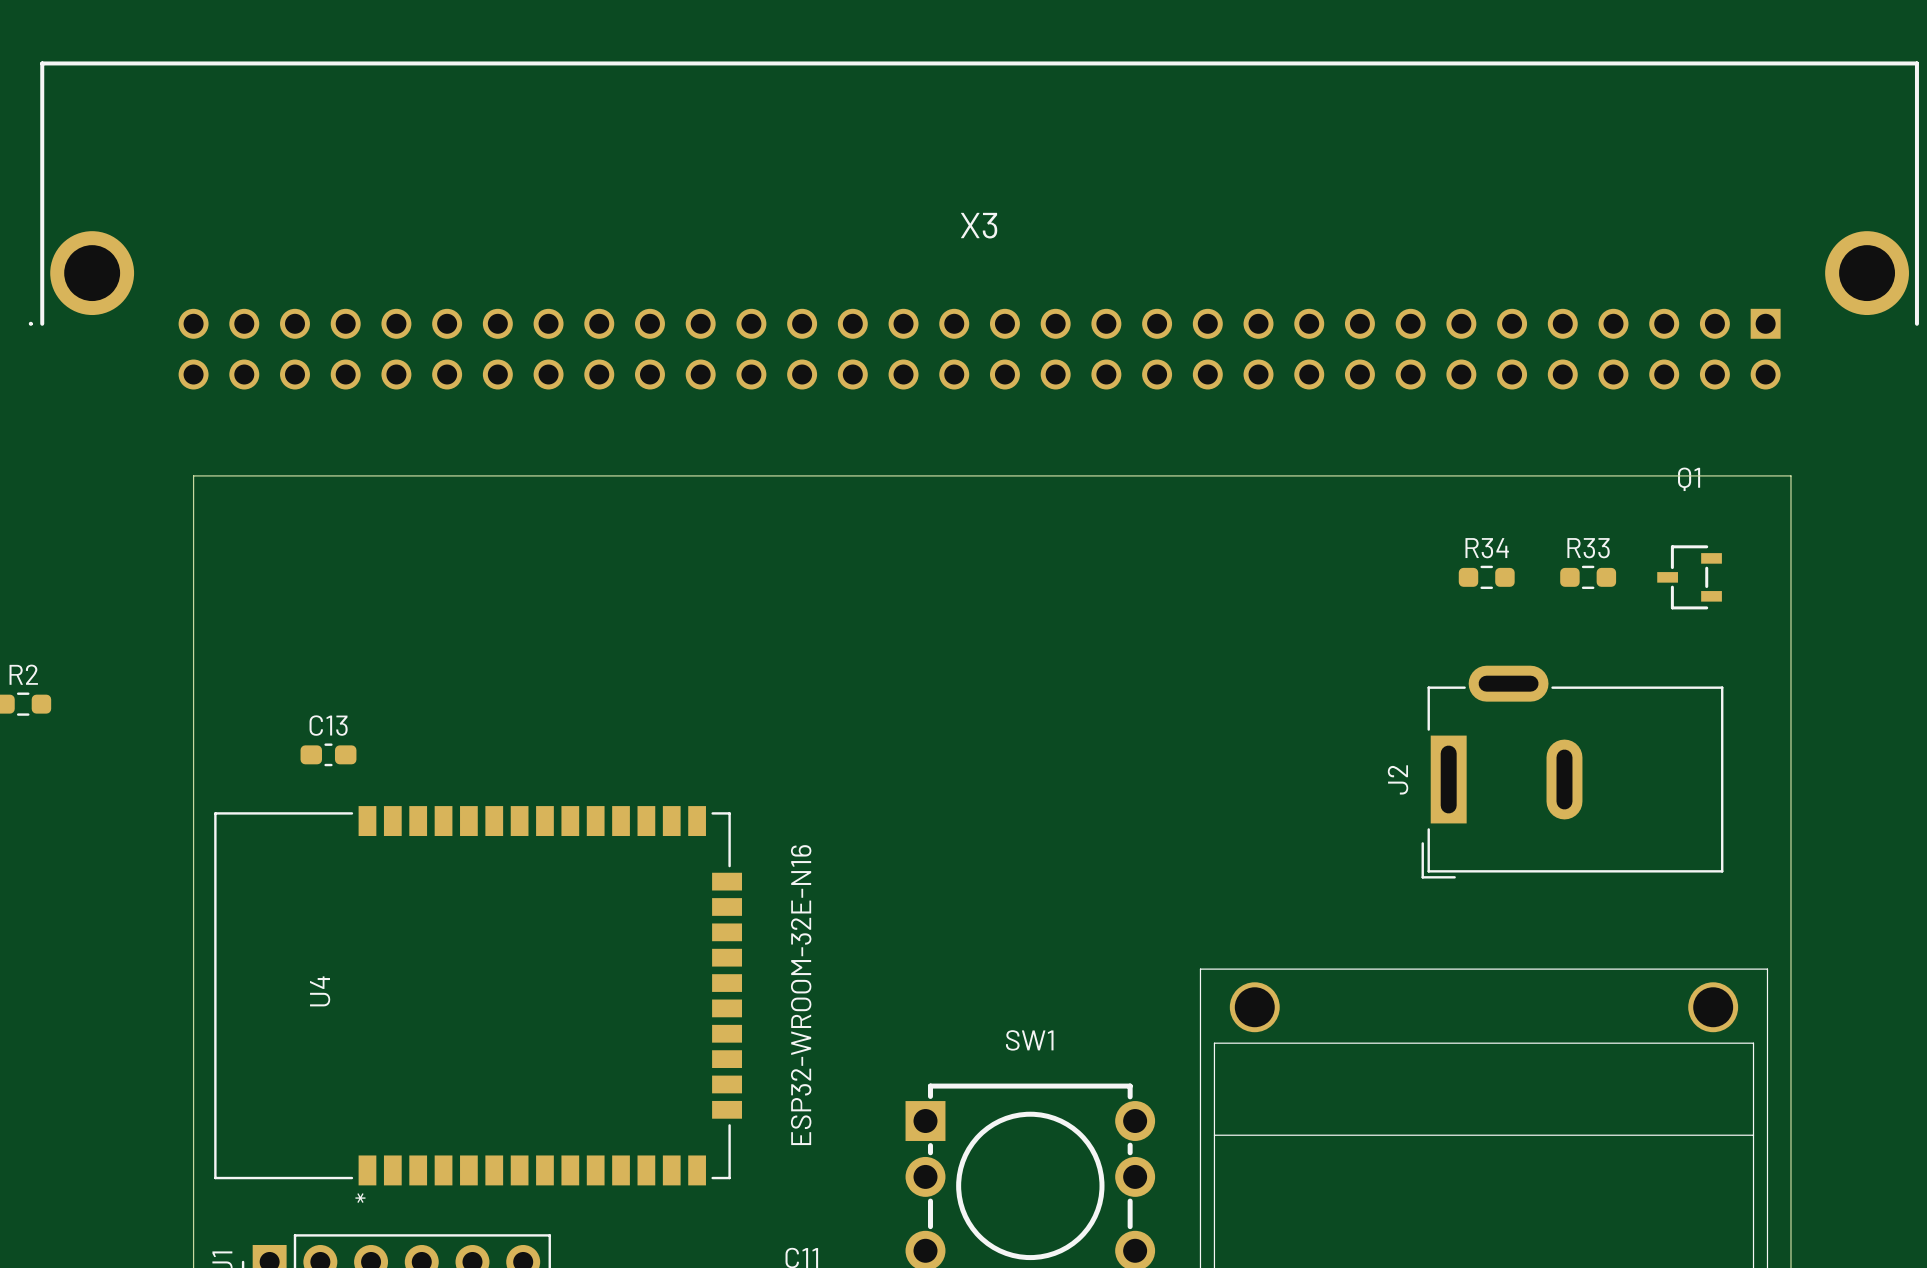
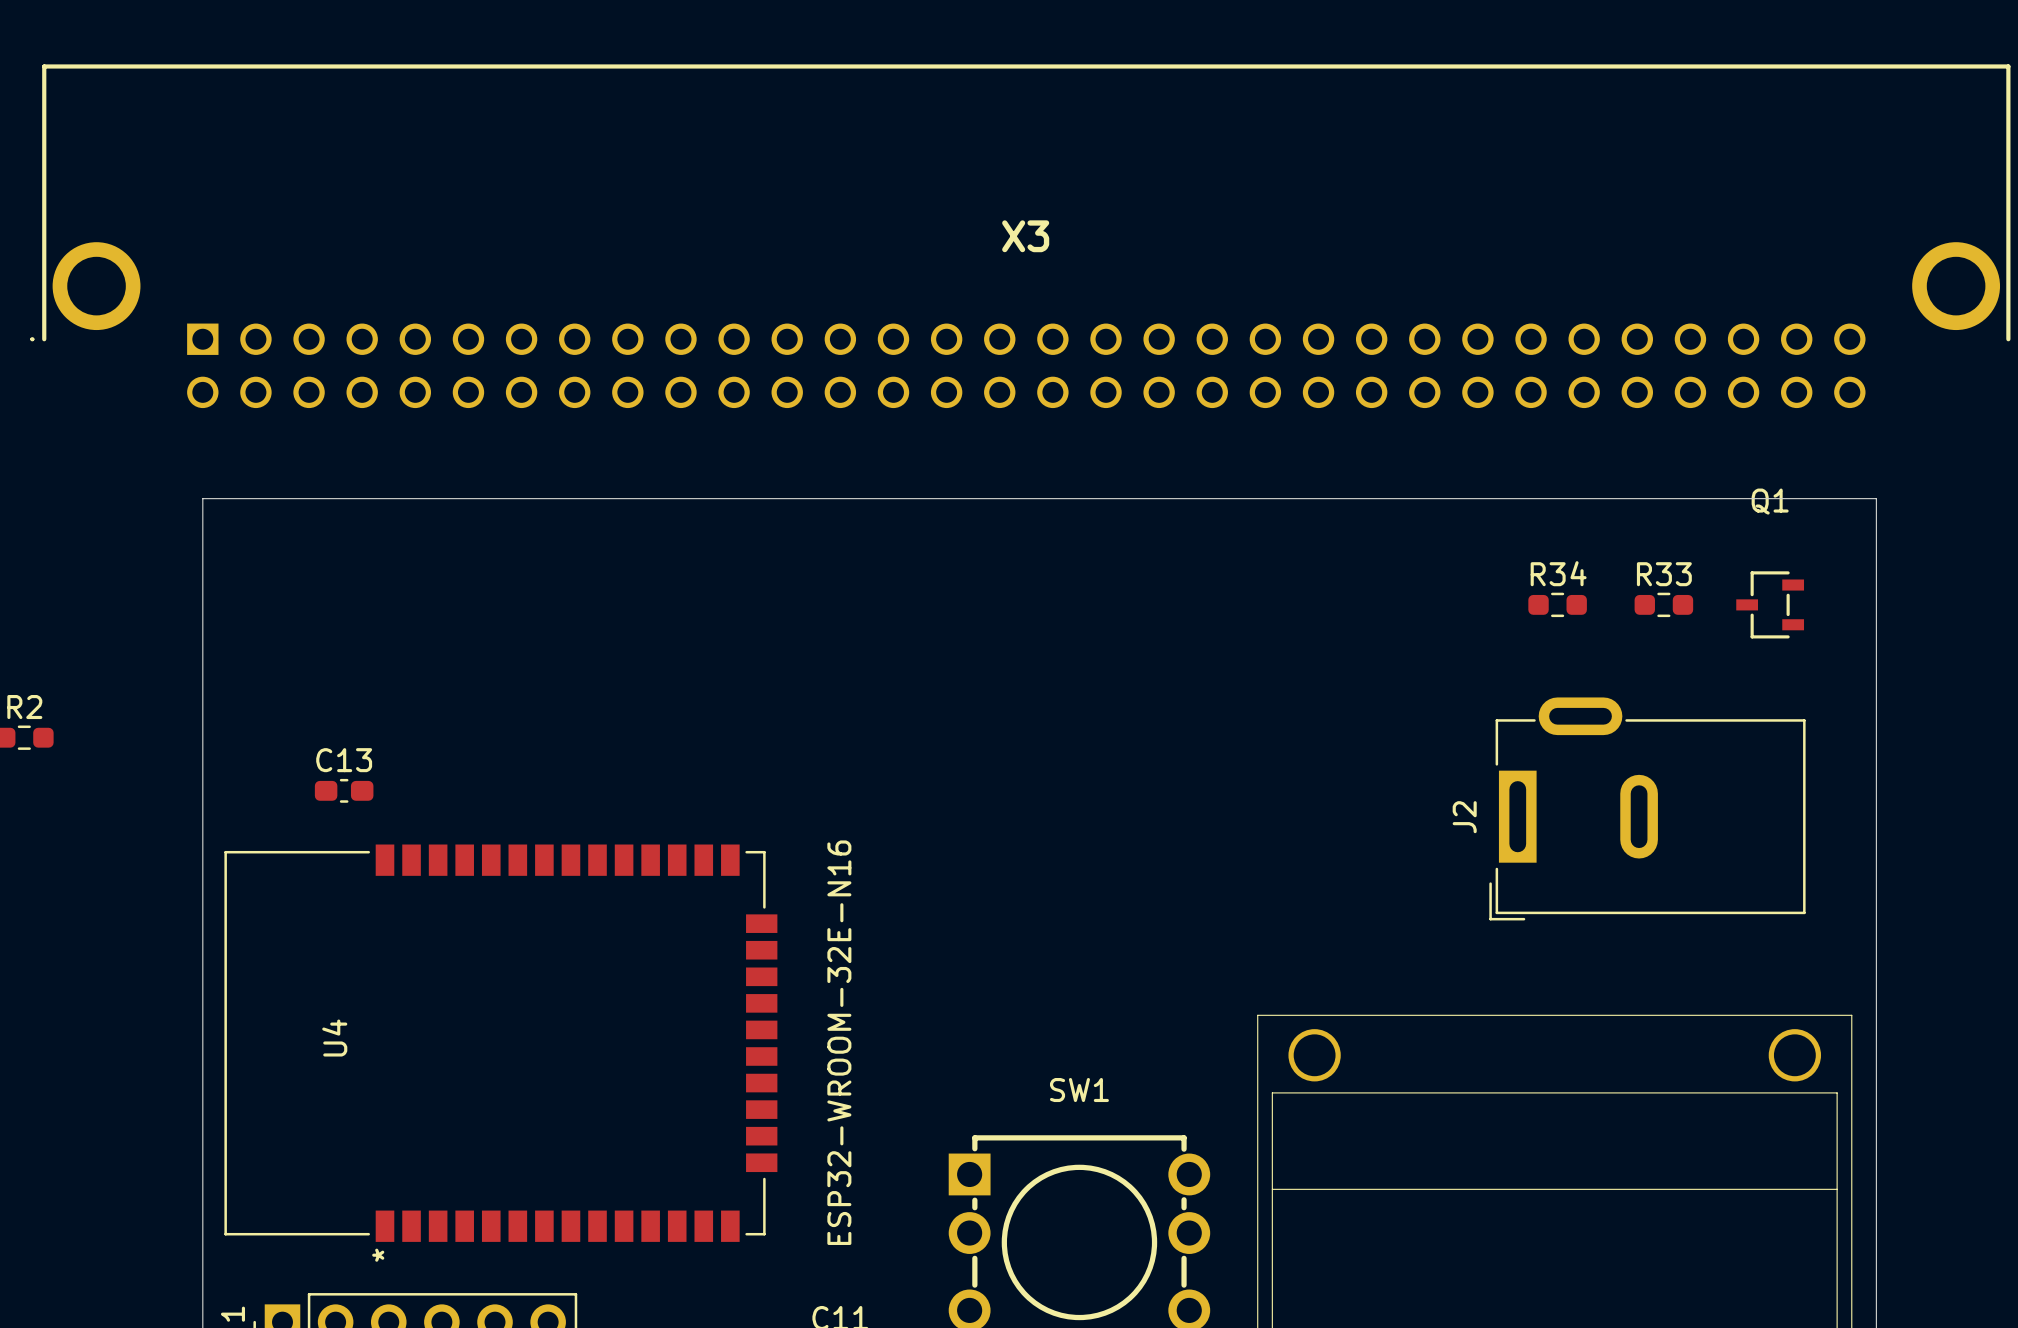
X3 footprint: [28, 61, 1919, 390] -> [30, 64, 2011, 409]

